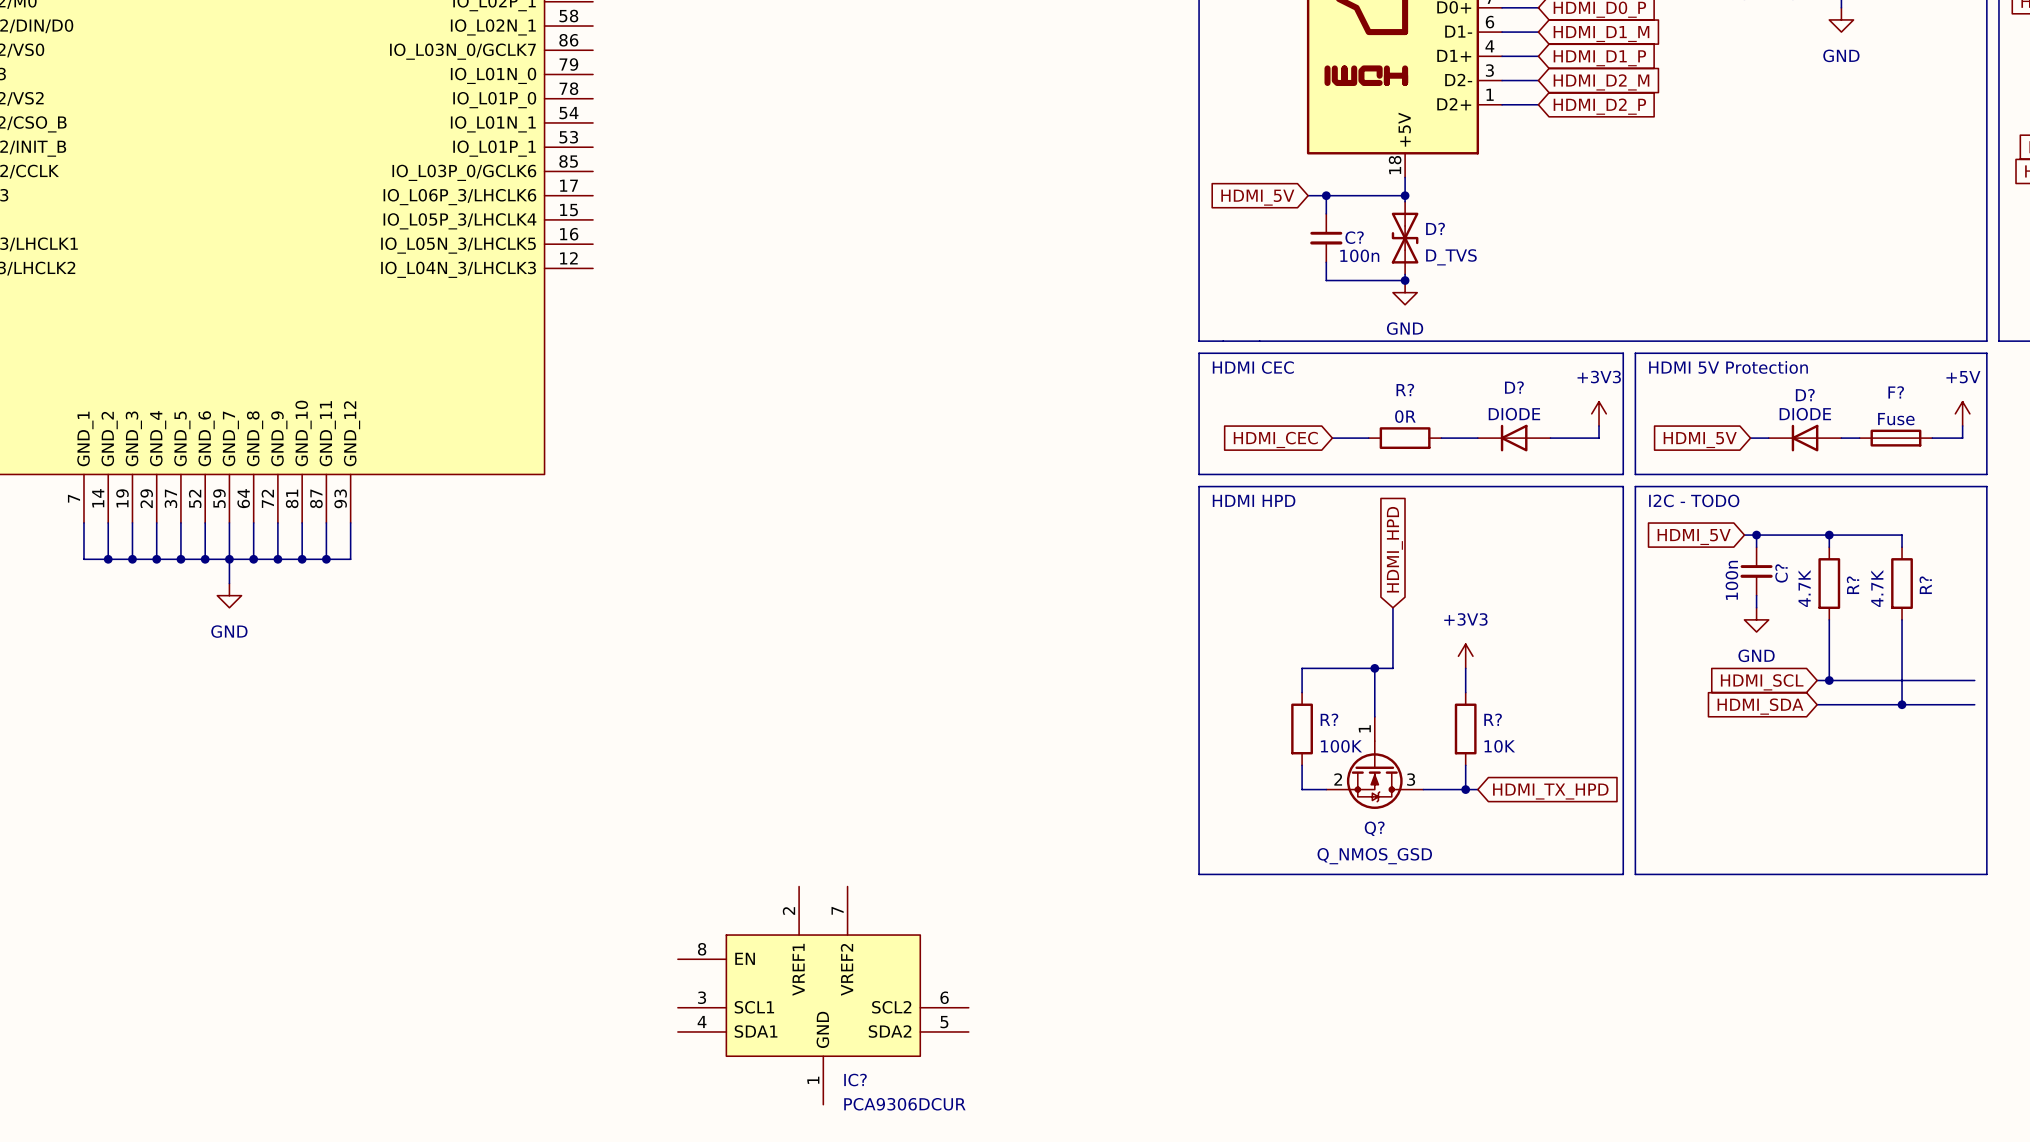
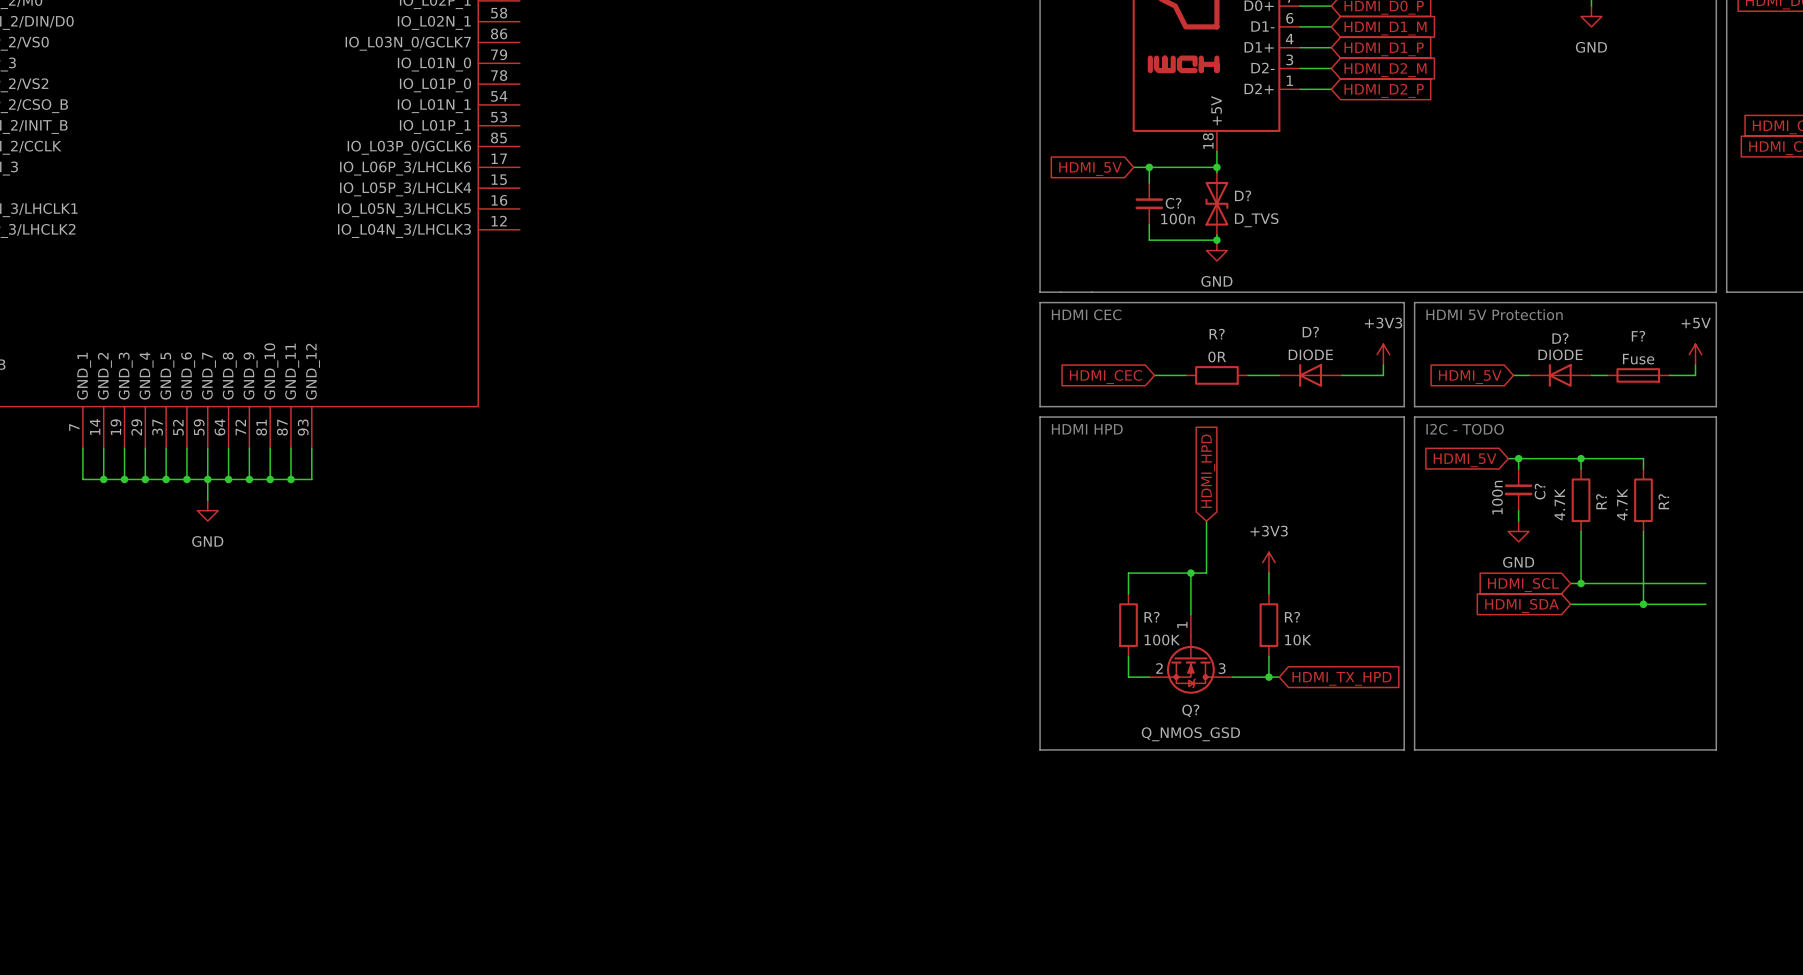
IC?: PCA9306DCUR (823, 995) -> none

